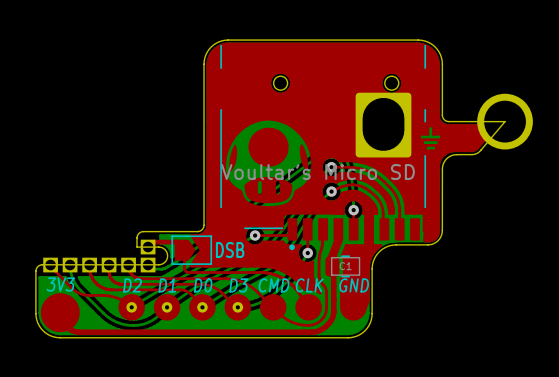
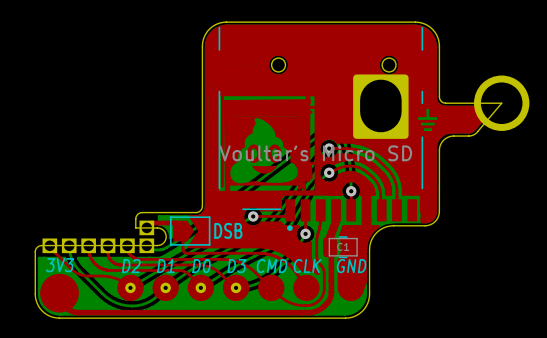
top track: none -> (222, 91) (222, 186)
drawing shape: [219, 113, 318, 212] -> [229, 116, 299, 186]
top track: none -> (307, 96) (307, 180)
top track: none -> (308, 96) (308, 163)
top track: none -> (309, 100) (224, 101)
top track: none -> (309, 102) (224, 103)
top track: none -> (308, 104) (223, 106)
top track: none -> (320, 107) (225, 108)
top track: none -> (308, 109) (223, 110)
top track: none -> (311, 112) (225, 112) (226, 192) (228, 190) (227, 114)
top track: none -> (302, 113) (301, 187)
top track: none -> (299, 114) (299, 188)
top track: none -> (304, 113) (304, 189)
top track: none -> (306, 114) (224, 115)
top track: none -> (324, 163) (308, 163) (309, 180)
top track: none -> (310, 165) (311, 178)

